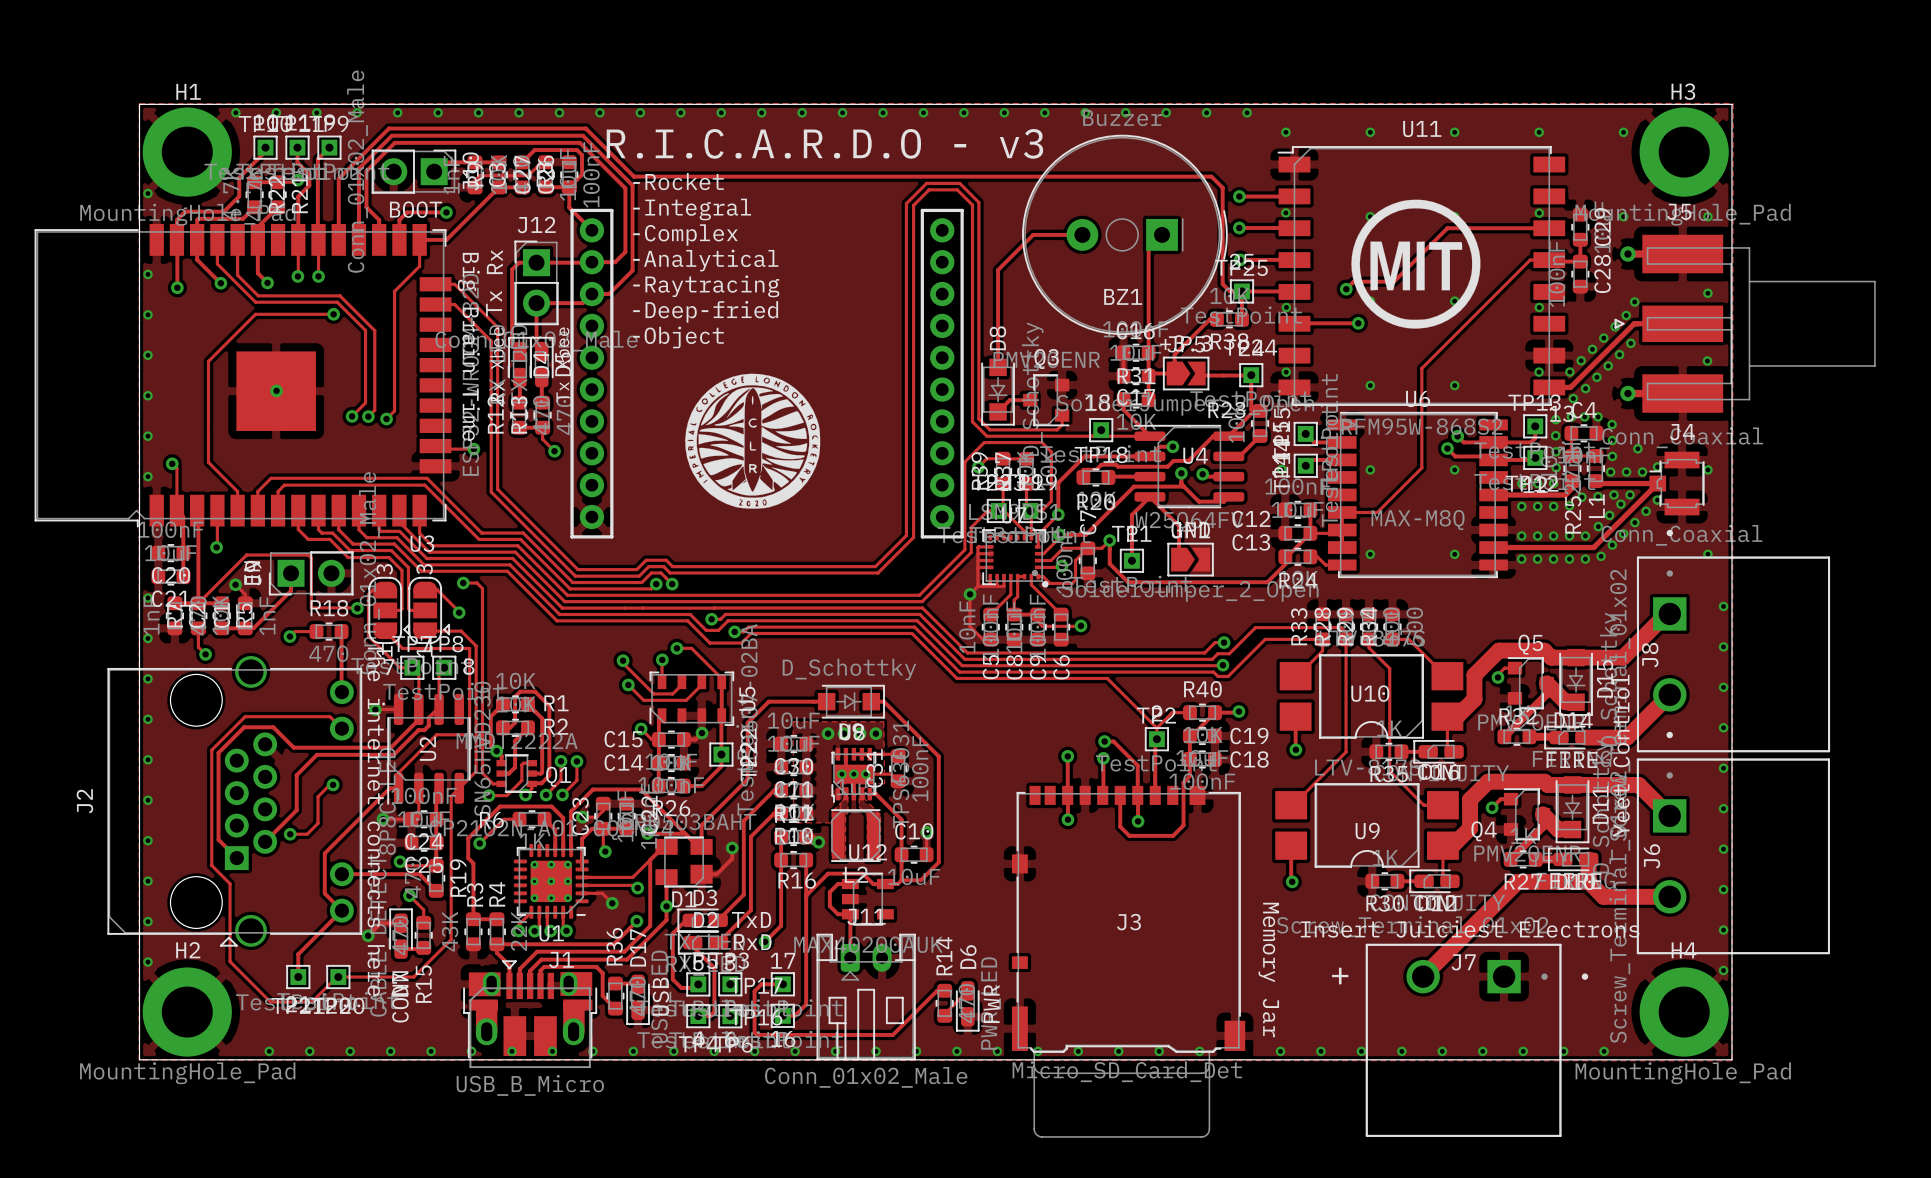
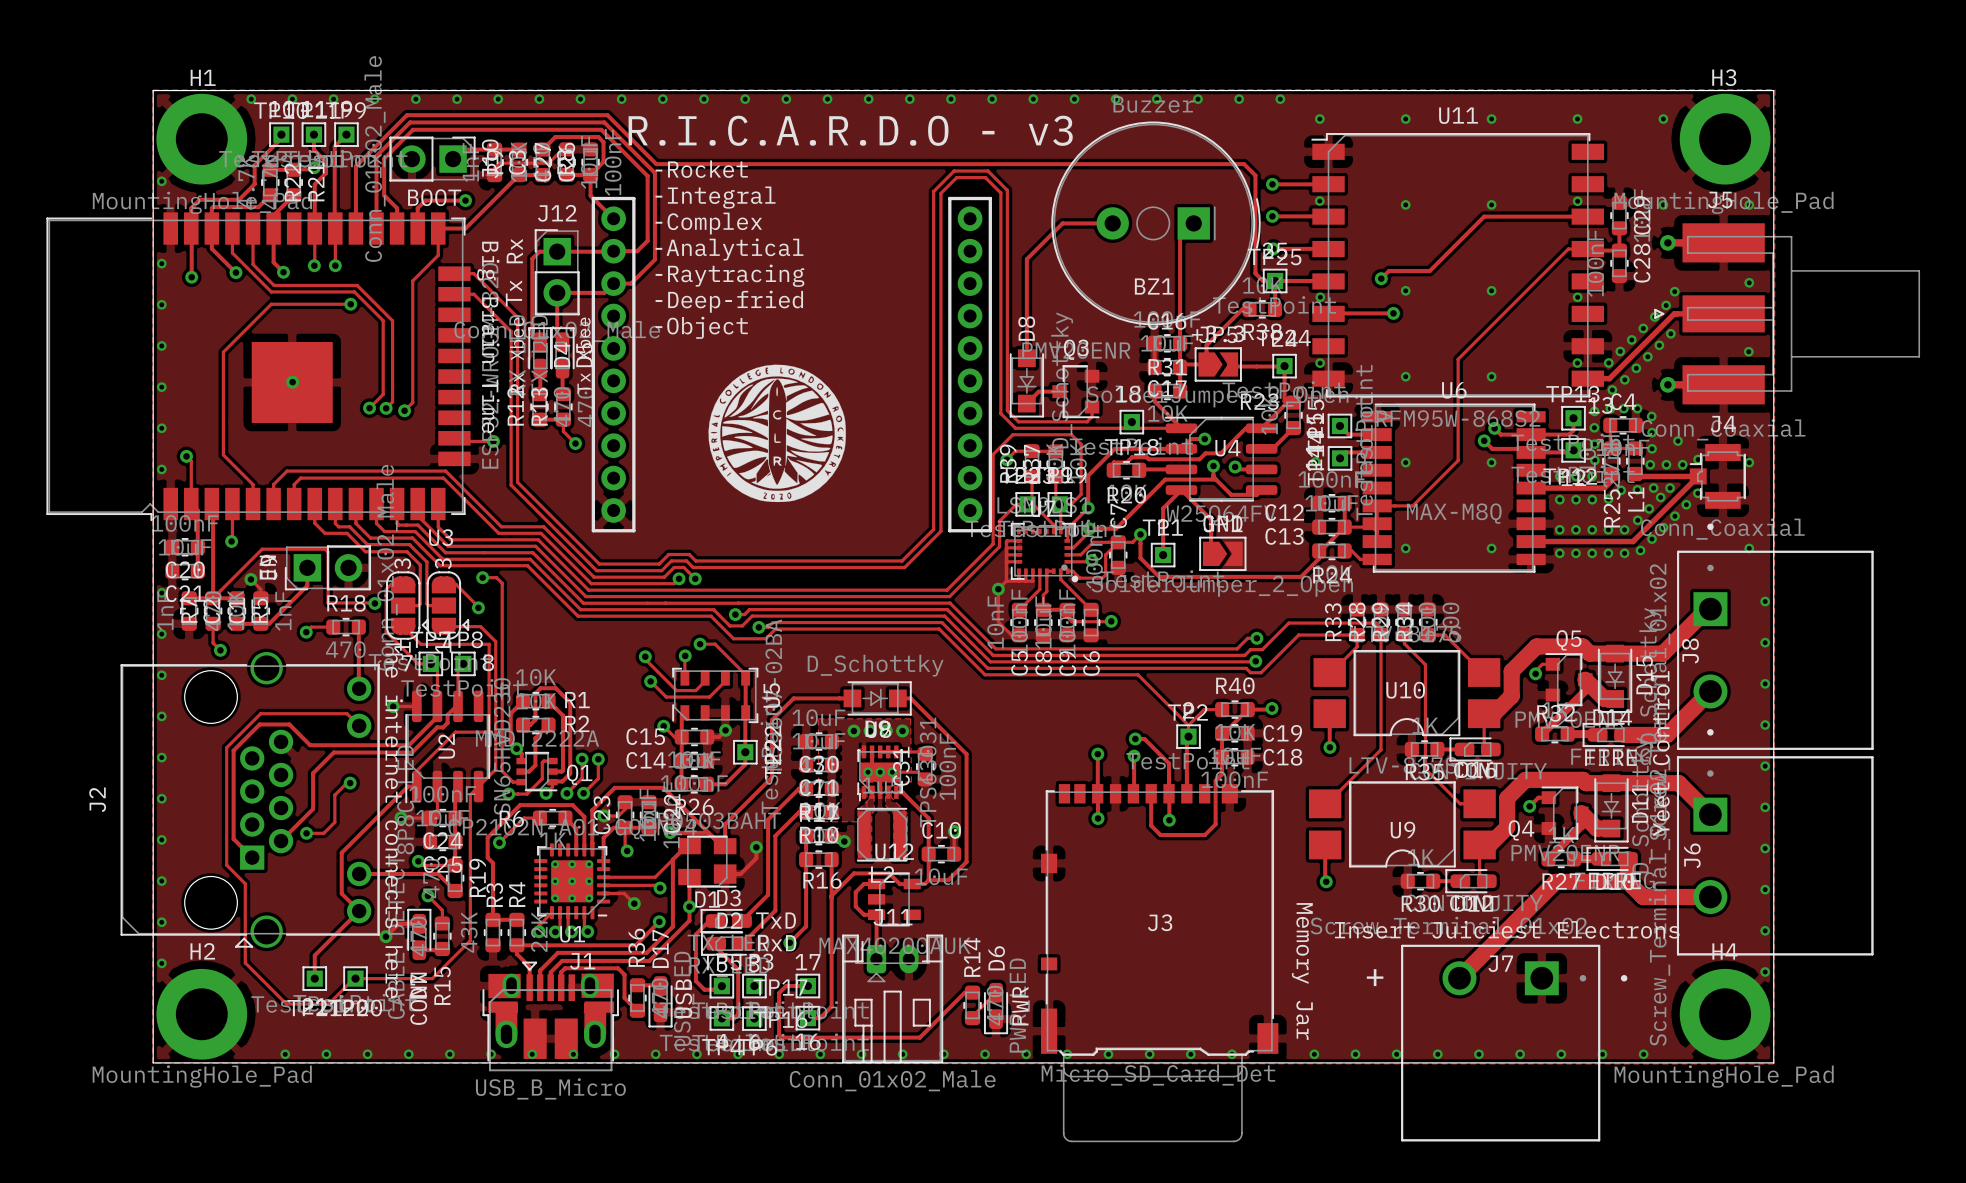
drawing: [1351, 199, 1481, 329] -> none

